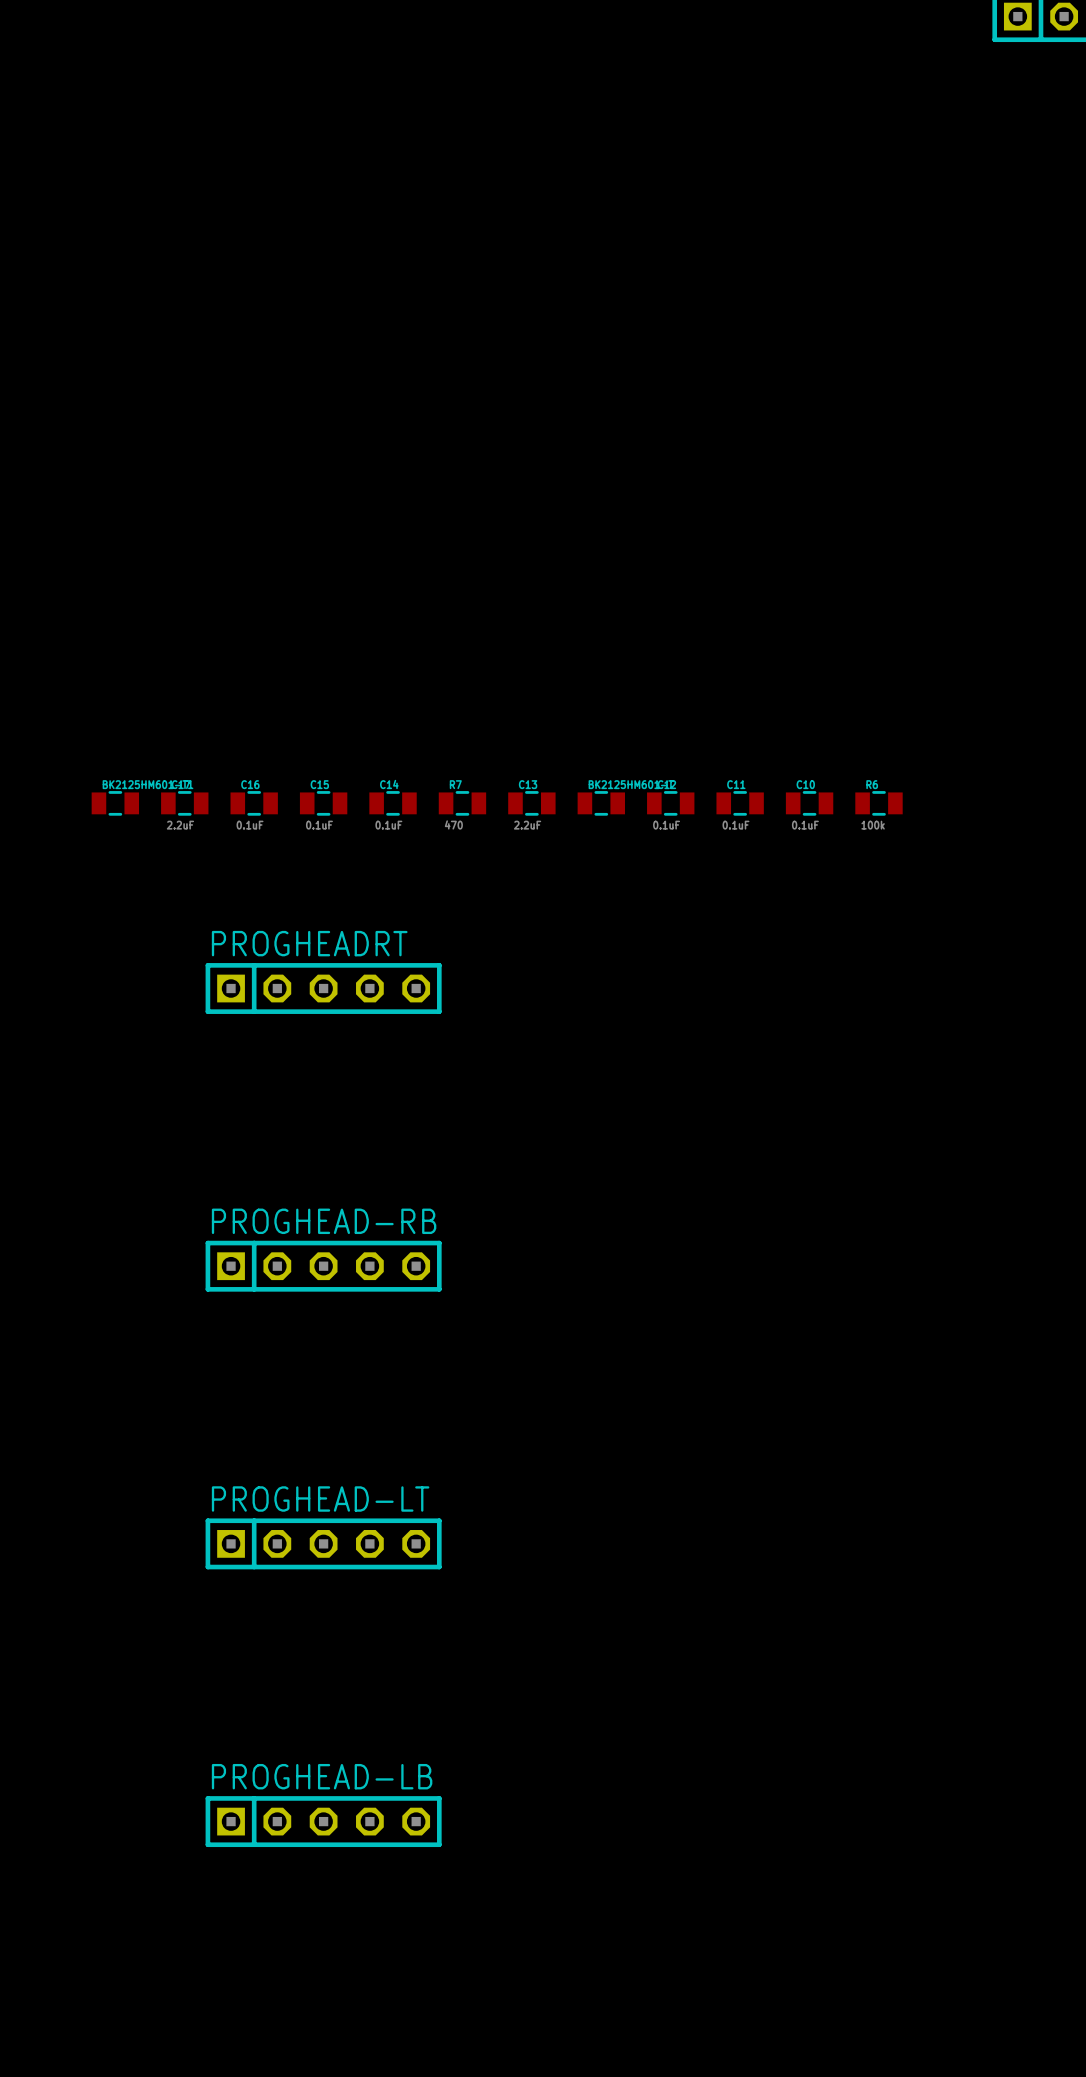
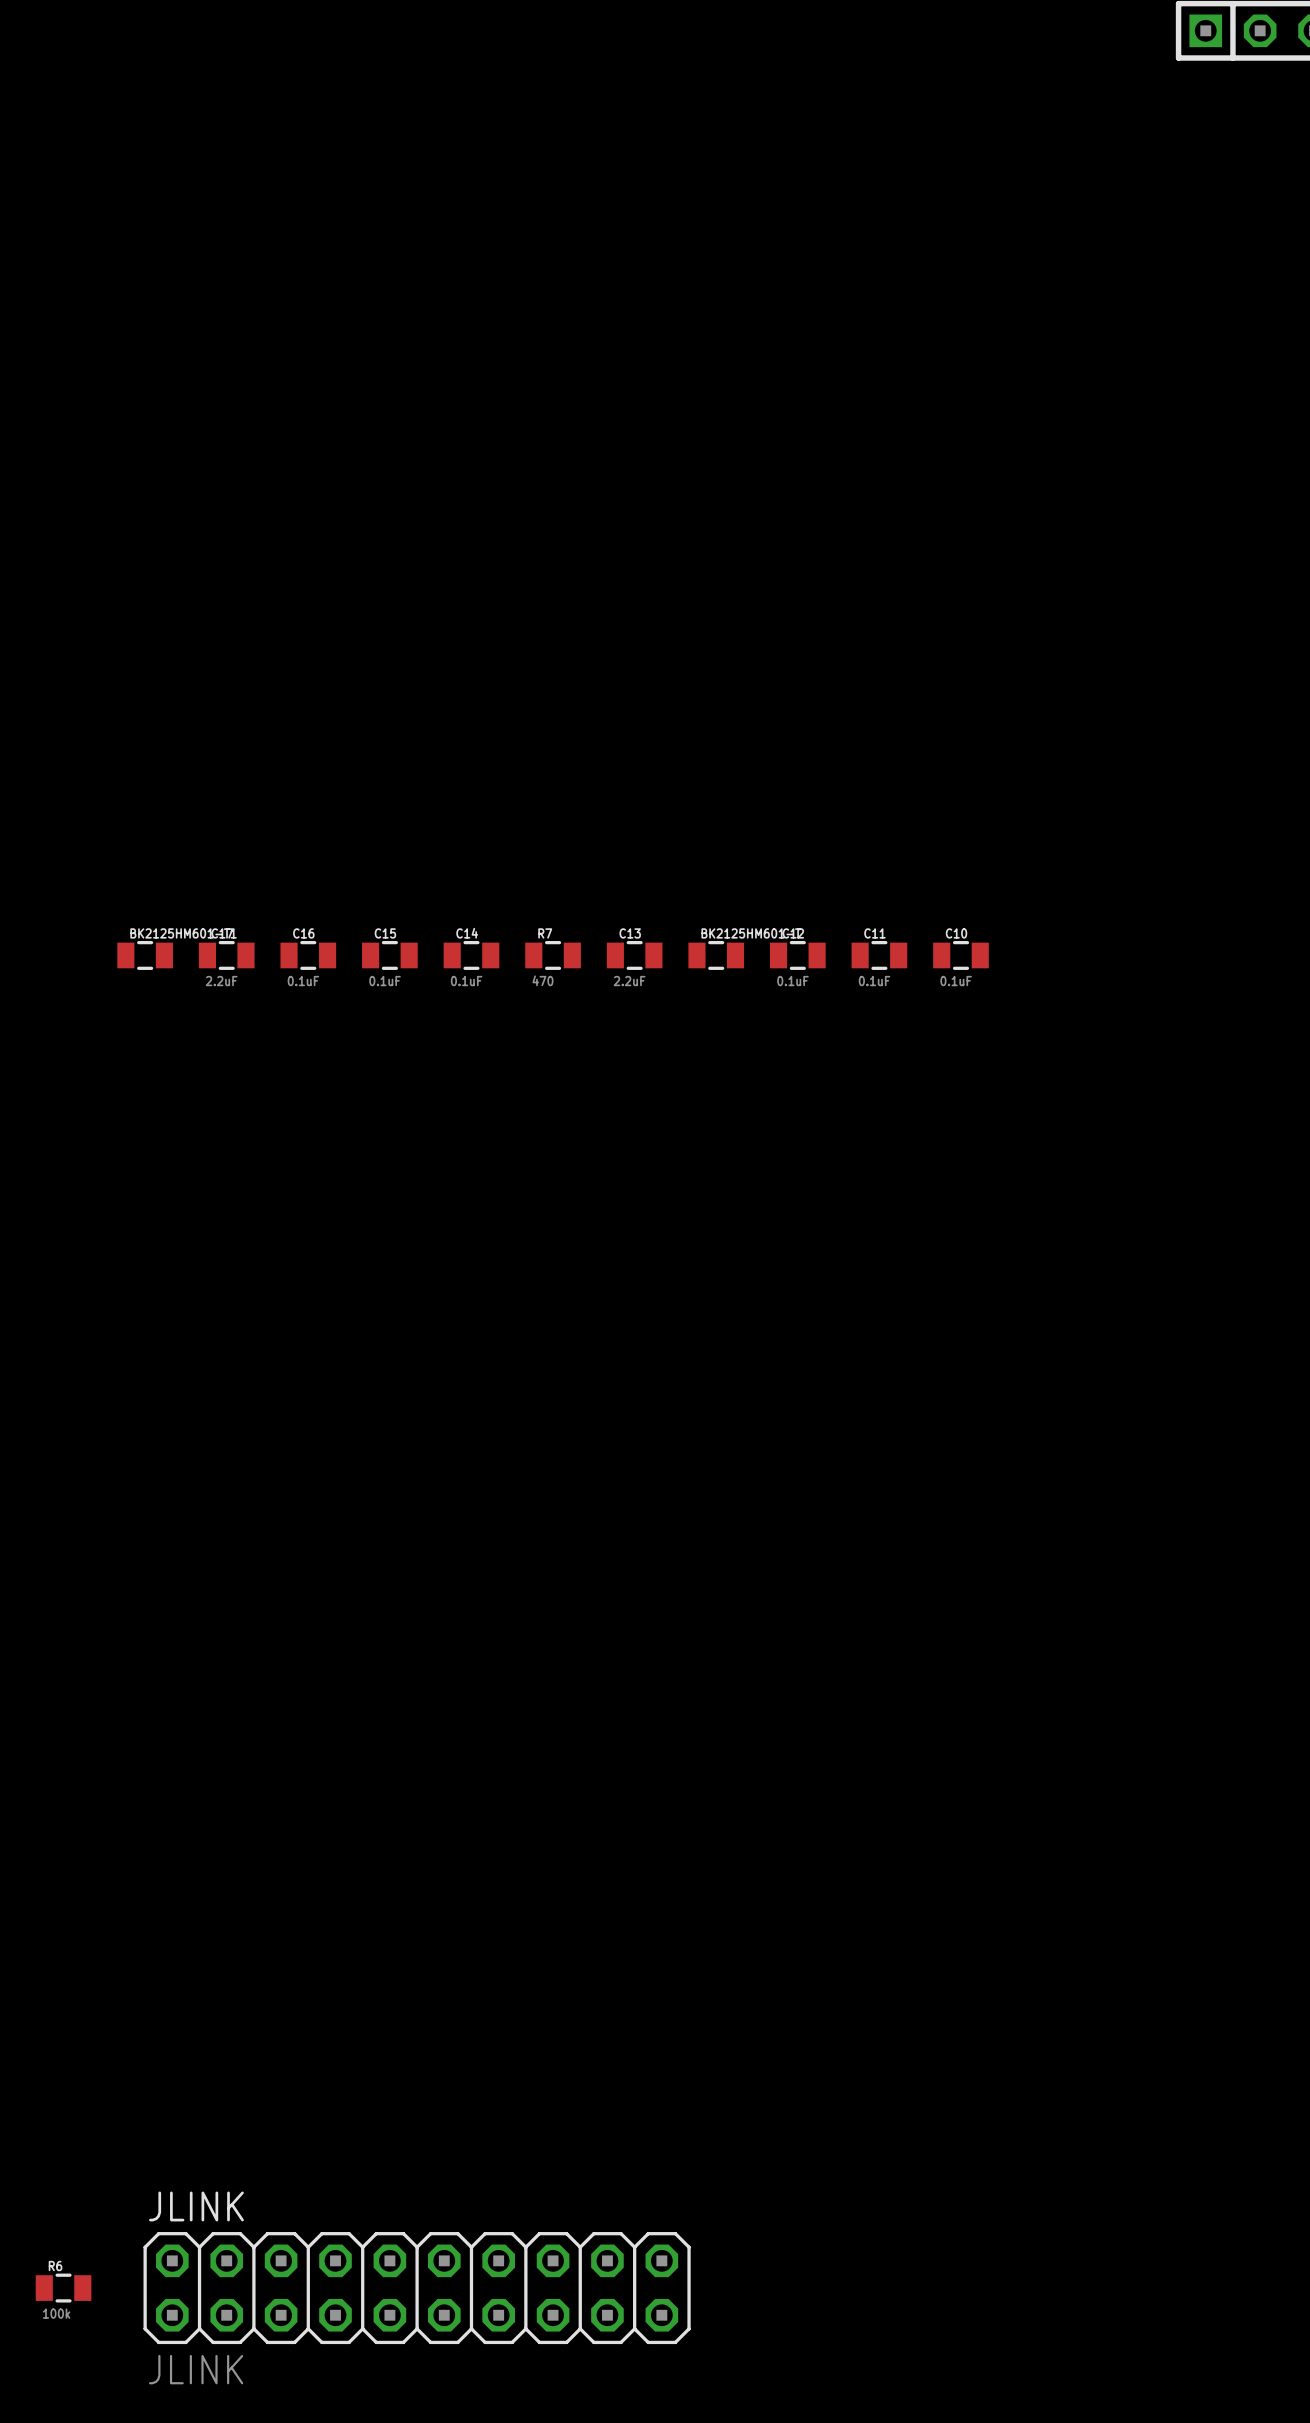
R6 position: (879, 803) -> (63, 2288)
PROGHEADRT: (323, 988) -> none
PROGHEAD-RB: (323, 1266) -> none
PROGHEAD-LT: (323, 1543) -> none
PROGHEAD-LB: (323, 1821) -> none
JLINK: none -> JLINK (417, 2288)

